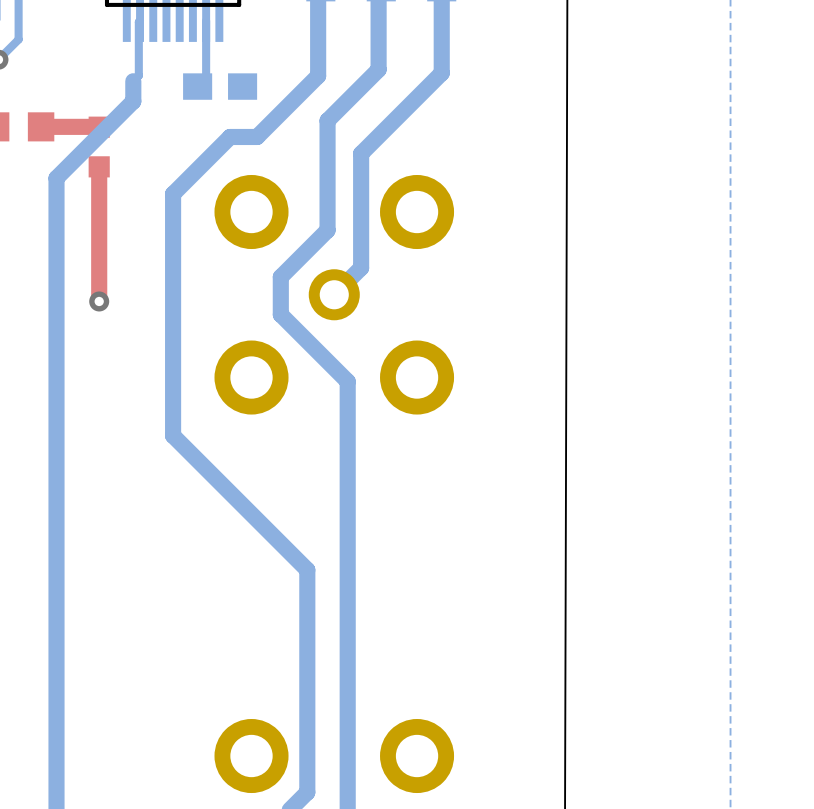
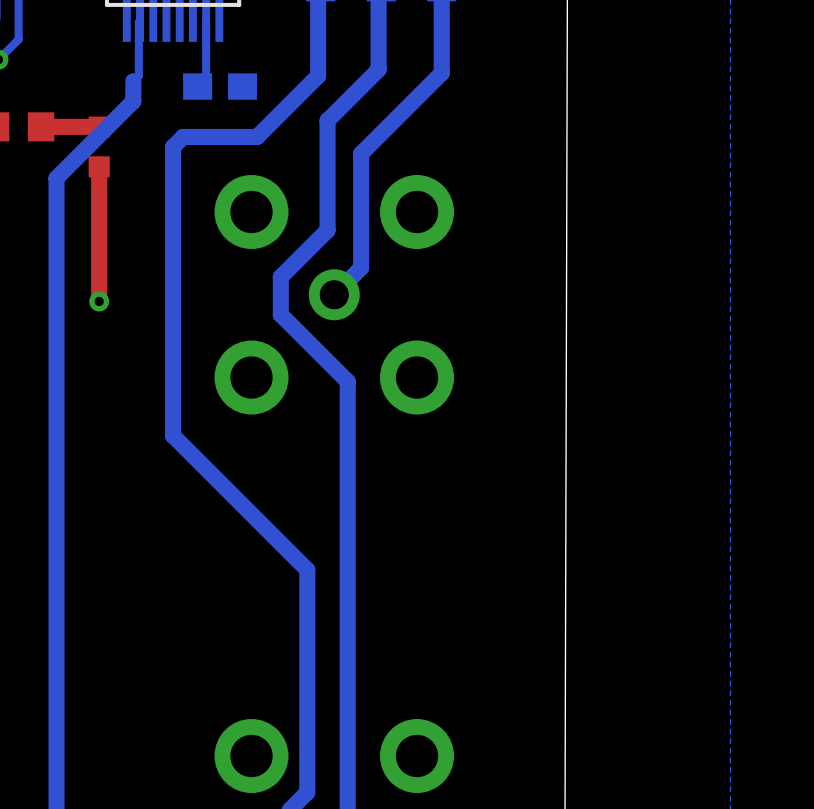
bottom track: (230, 136) (173, 194) -> (230, 136) (183, 136) (173, 147) (173, 194)

